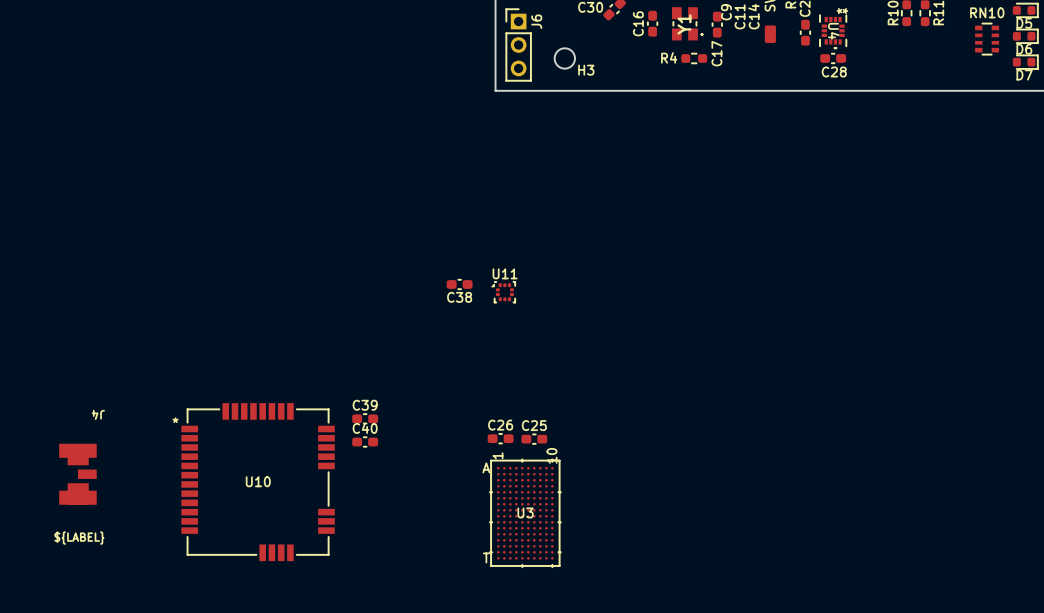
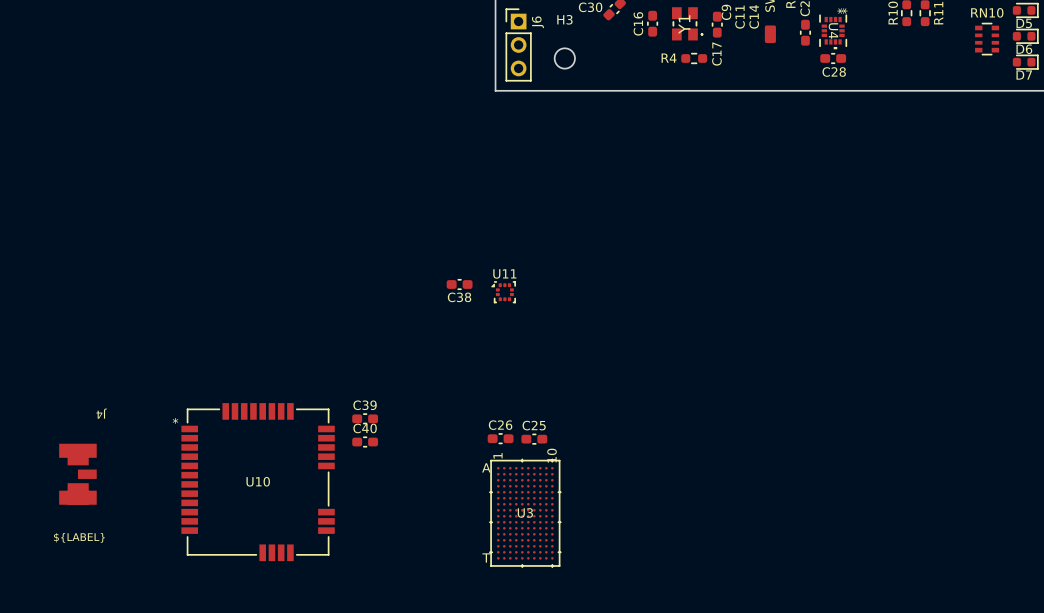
H3 name position: H3 (586, 70) -> H3 (564, 19)

